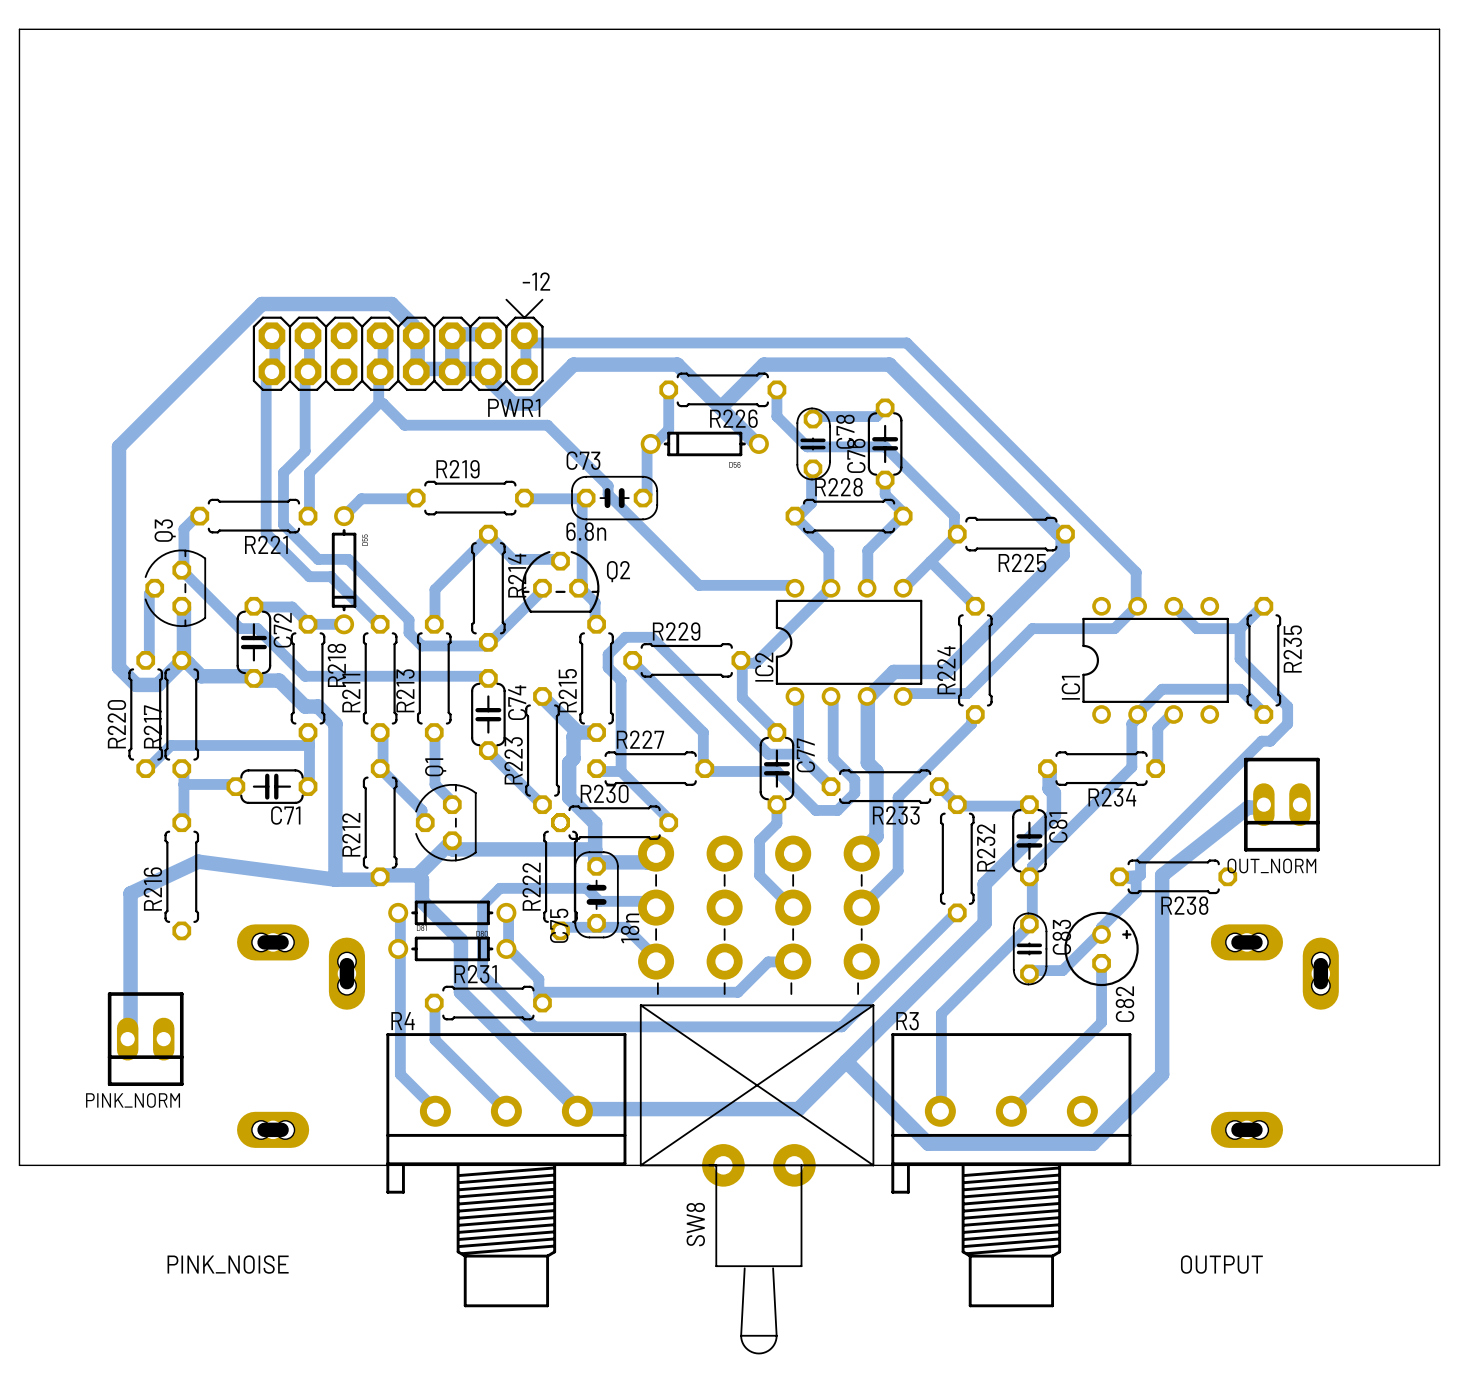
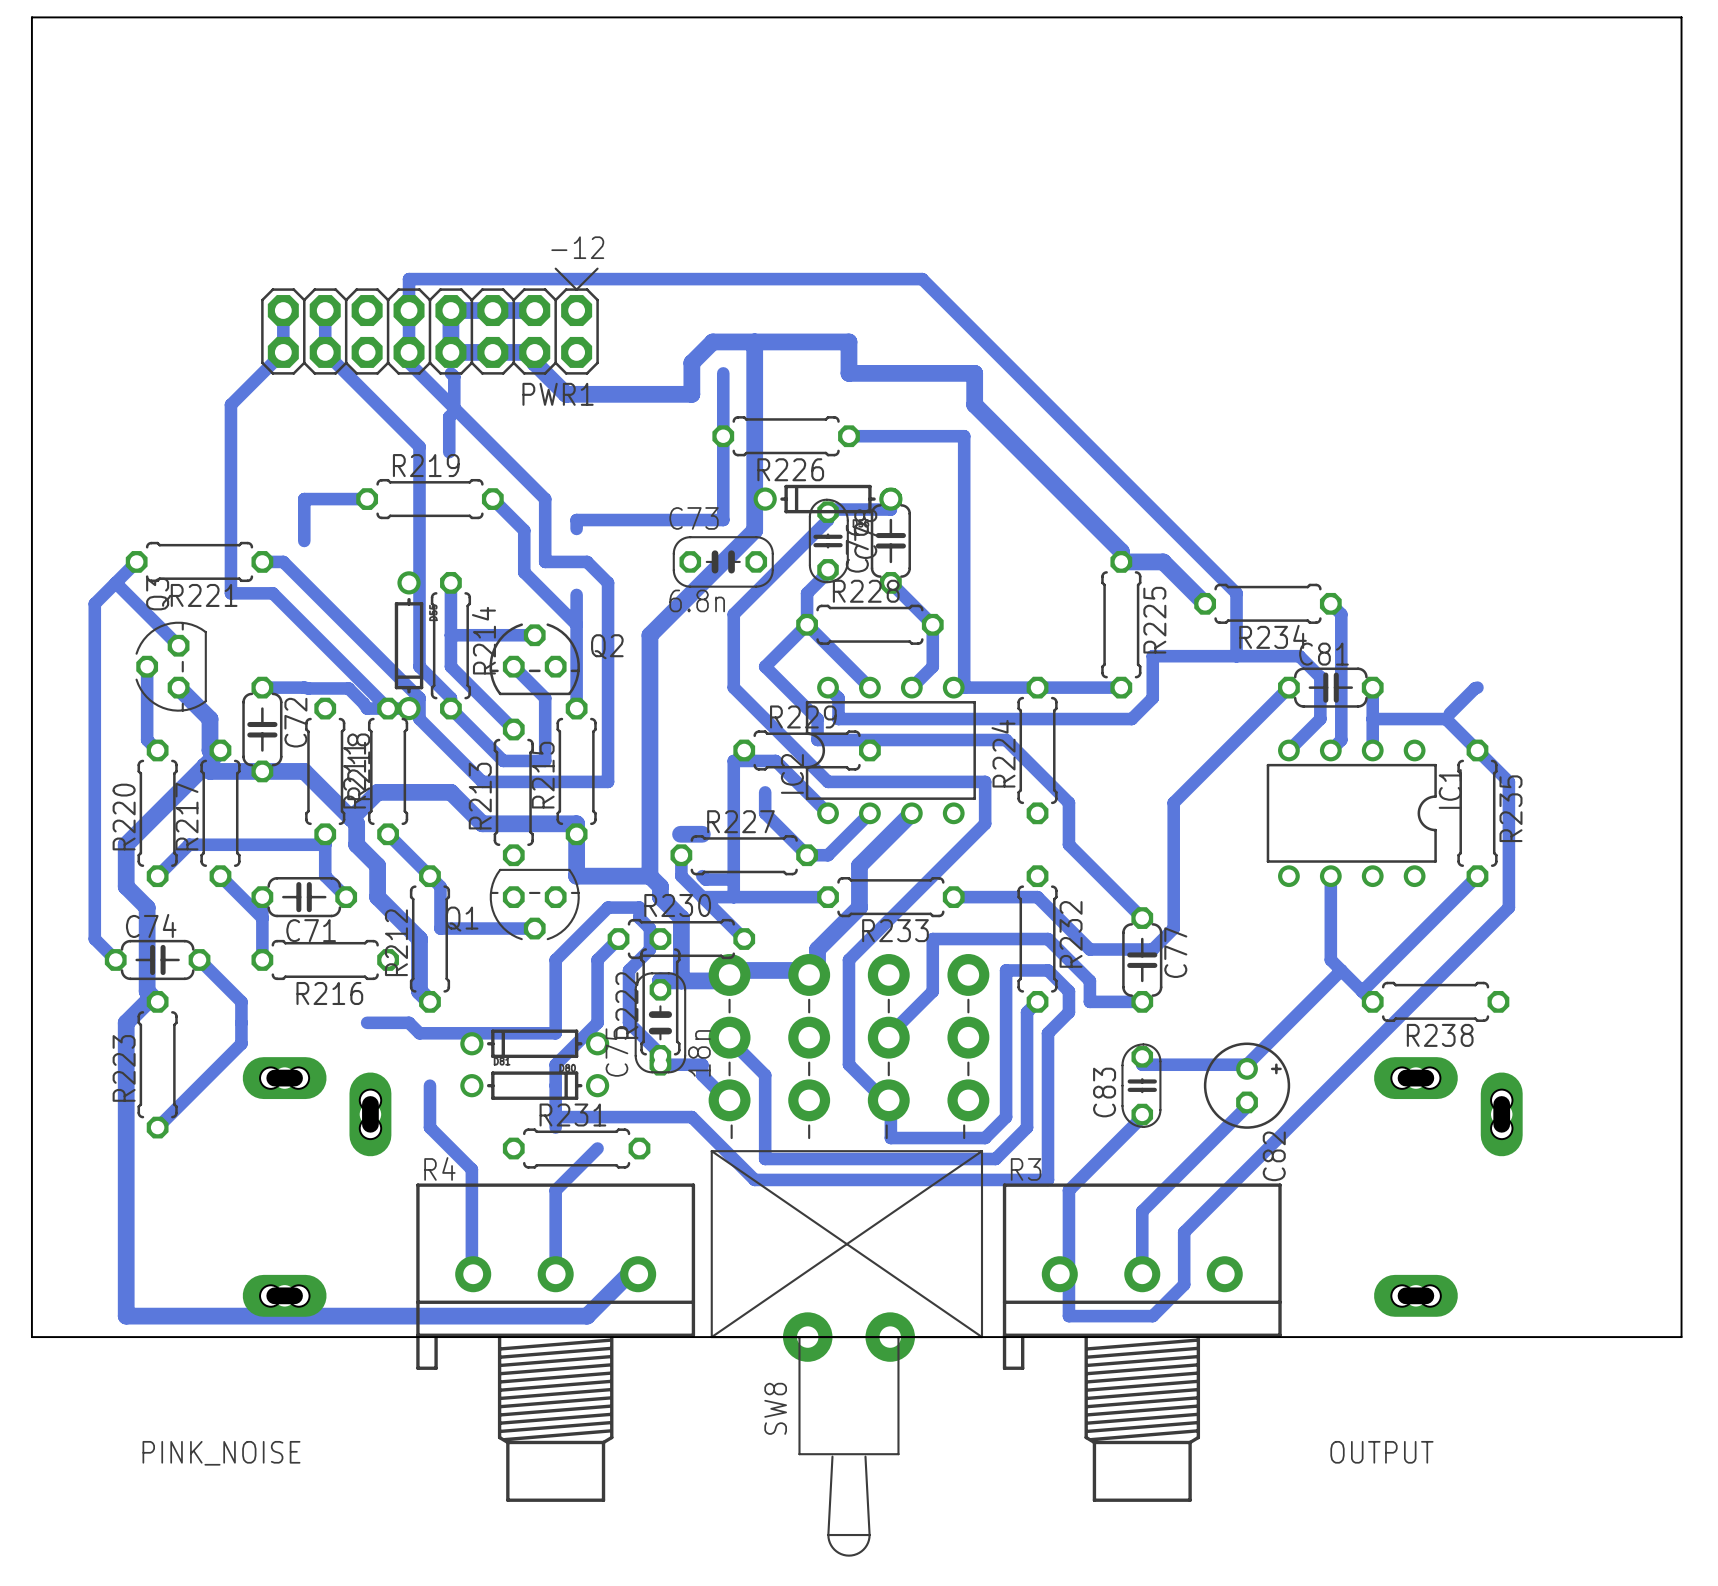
bottom track: none -> (283, 310) (283, 352) (230, 404) (230, 593) (272, 593) (388, 708)
bottom track: none -> (325, 310) (325, 352) (419, 446) (419, 666) (450, 698) (450, 708) (503, 760) (545, 760) (545, 698) (513, 666)
bottom track: none -> (534, 310) (450, 310) (450, 352) (534, 352) (534, 362) (566, 394) (691, 394) (691, 362) (712, 341) (848, 341) (848, 373) (974, 373) (974, 404) (1121, 551) (1121, 561) (1163, 561) (1205, 603)
bottom track: none -> (754, 341) (754, 530) (649, 635) (649, 876)
bottom track: (271, 335) (274, 338) (274, 368) (266, 377) (266, 533) (309, 576) (331, 576) (380, 624) -> none
bottom track: (308, 335) (309, 368) (305, 373) (305, 451) (283, 472) (283, 524) (318, 559) (348, 559) (409, 619) (409, 632) (422, 645) (486, 645) (488, 642) (543, 589) (542, 588) -> none
bottom track: (488, 335) (452, 335) (452, 371) (456, 368) (482, 368) (491, 373) (491, 381) (512, 403) (534, 403) (573, 364) (677, 364) (758, 443) -> (555, 1117) (691, 1117) (754, 1179) (1048, 1179) (1048, 1033) (1068, 1012) (1068, 991) (1048, 970) (1006, 970) (1006, 1117) (985, 1138) (890, 1138) (890, 1106) (888, 1100) (880, 1096) (848, 1064) (848, 959) (985, 823) (985, 781) (828, 781) (733, 687) (733, 614) (828, 520) (828, 509) (890, 509) (890, 499)
bottom track: none -> (723, 373) (723, 520) (576, 520) (576, 528)
PWR1 position: (398, 344) -> (429, 321)
bottom track: (452, 368) (422, 368) (416, 371) (417, 338) (413, 325) (391, 304) (261, 304) (119, 446) (119, 667) (136, 684) (157, 684) (181, 660) -> none
bottom track: (524, 371) (524, 335) (530, 342) (906, 342) (1136, 572) (1137, 606) (1114, 628) (1032, 628) (967, 693) (906, 693) (903, 696) -> none
bottom track: (668, 389) (668, 429) (655, 442) (647, 446) (647, 494) (643, 498) -> none
bottom track: none -> (848, 436) (964, 436) (964, 687)
R226 position: (722, 389) -> (786, 436)
bottom track: (776, 389) (776, 416) (807, 446) (885, 446) (954, 516) (954, 533) (957, 534) (903, 588) -> none
bottom track: (720, 407) (763, 364) (889, 364) (1058, 533) (1065, 534) (1062, 537) (1062, 555) (945, 671) (893, 671) (867, 696) (867, 762) (876, 771) (876, 836) (861, 853) -> none
bottom track: (885, 407) (876, 416) (815, 416) (813, 419) -> none
bottom track: none -> (367, 499) (304, 499) (304, 540)
bottom track: none -> (492, 499) (524, 530) (524, 572) (576, 624)
C78 position: (813, 443) -> (828, 540)
C76 position: (885, 443) -> (890, 540)
bottom track: (813, 468) (811, 503) (798, 516) (794, 516) (828, 550) (828, 585) (831, 588) (755, 663) (746, 663) (740, 660) (742, 697) (776, 732) -> none
bottom track: (885, 480) (885, 494) (902, 511) (903, 516) (867, 550) (867, 588) -> none
bottom track: none -> (136, 561) (94, 603) (94, 939) (115, 959)
bottom track: none -> (262, 561) (283, 561) (419, 698) (419, 719) (482, 781) (608, 781) (608, 582) (587, 561) (545, 561) (545, 499) (409, 362) (409, 279) (922, 279) (1236, 593) (1236, 656)
bottom track: (416, 498) (361, 498) (344, 516) -> none
R219 position: (470, 498) -> (429, 499)
bottom track: (524, 498) (586, 498) (582, 503) (582, 585) (578, 588) (595, 602) (596, 624) -> none
bottom track: none -> (828, 569) (828, 572) (807, 593) (807, 624)
bottom track: none -> (115, 582) (178, 645)
bottom track: (199, 516) (196, 516) (183, 529) (183, 568) (181, 570) (240, 628) (257, 628) (305, 676) (486, 676) (488, 678) -> none
R221 position: (253, 516) -> (199, 561)
bottom track: (308, 516) (309, 472) (378, 403) (383, 403) (404, 425) (547, 425) (608, 485) (608, 494) (699, 585) (794, 585) (794, 588) -> none
bottom track: none -> (450, 582) (450, 666) (513, 729)
bottom track: none -> (890, 582) (932, 624) (932, 666) (911, 687)
R228 position: (849, 516) -> (869, 624)
bottom track: none -> (576, 594) (576, 708)
R225 rotation: 0° (1011, 534) -> 90° clockwise (1121, 624)
bottom track: none -> (1330, 603) (1341, 614) (1341, 740) (1330, 750)
bottom track: none -> (807, 624) (765, 666) (817, 719) (817, 740) (1006, 740) (1068, 802) (1068, 844) (1142, 918)
bottom track: none -> (807, 624) (869, 687)
bottom track: none -> (450, 635) (534, 635)
bottom track: (560, 561) (560, 559) (512, 559) (488, 534) (434, 589) (434, 624) -> none
bottom track: (930, 561) (975, 606) -> none
R225 name position: R225 (1022, 562) -> R225 (1154, 620)
Q2 position: (560, 581) -> (534, 659)
bottom track: none -> (147, 666) (147, 740) (157, 750)
bottom track: (154, 588) (149, 594) (149, 658) (145, 660) -> none
Q3 position: (175, 588) -> (171, 666)
R214 position: (488, 588) -> (450, 645)
bottom track: none -> (178, 687) (210, 719) (210, 750) (220, 750) (126, 844) (126, 886) (147, 907) (147, 991) (157, 1001) (147, 1001) (126, 1022) (126, 1316) (587, 1316) (629, 1274) (638, 1274)
bottom track: (181, 606) (183, 607) (183, 658) (181, 660) -> none
bottom track: none -> (262, 687) (304, 687)
bottom track: none -> (828, 687) (838, 698) (838, 719) (1131, 719) (1152, 698) (1152, 656) (1299, 656) (1320, 677) (1320, 719) (1288, 750)
bottom track: none -> (953, 687) (1121, 687)
bottom track: none -> (1288, 687) (1173, 802) (1173, 928) (1152, 949) (1089, 949) (1037, 897) (953, 897)
bottom track: (1173, 606) (1196, 628) (1240, 628) (1240, 658) (1287, 706) (1287, 723) (1270, 741) (1261, 741) (1140, 862) (1140, 875) (1119, 876) (1136, 879) (1136, 892) (1101, 927) (1101, 934) -> (1372, 687) (1372, 750)
bottom track: none -> (1372, 719) (1446, 719) (1508, 781) (1508, 907) (1184, 1232) (1184, 1284) (1152, 1316) (1068, 1316) (1068, 1190) (1142, 1117) (1142, 1114)
C72 position: (253, 642) -> (262, 729)
IC2 position: (849, 642) -> (890, 750)
bottom track: (181, 660) (188, 663) (201, 676) (253, 676) (257, 680) (279, 680) (305, 706) (318, 706) (335, 723) (335, 879) -> none
bottom track: (632, 660) (703, 732) (703, 767) (707, 771) (776, 771) (815, 810) (837, 810) (854, 793) (854, 780) (833, 758) (833, 697) (831, 696) -> none
R224 position: (975, 660) -> (1037, 750)
IC1 rotation: 0° (1155, 660) -> 180° (1351, 813)
R235 position: (1263, 660) -> (1477, 813)
bottom track: none -> (204, 766) (210, 771) (304, 771) (356, 823) (356, 844) (377, 865) (377, 897) (419, 939) (419, 991) (429, 1001)
R218 position: (308, 678) -> (325, 771)
R211 position: (380, 678) -> (388, 771)
R213 position: (434, 678) -> (513, 792)
R215 position: (596, 678) -> (576, 771)
bottom track: (542, 696) (577, 732) (573, 736) (573, 758) (569, 762) (569, 797) (595, 823) (596, 866) (599, 862) (647, 862) (656, 853) -> none
bottom track: none -> (765, 792) (765, 813) (807, 855) (828, 855) (869, 813)
bottom track: (794, 696) (798, 697) (798, 754) -> none
R220 position: (145, 714) -> (157, 813)
C74 rotation: 0° (488, 714) -> 90° counterclockwise (157, 959)
C74 position: (488, 714) -> (157, 959)
bottom track: none -> (828, 813) (775, 760) (733, 760) (733, 897)
bottom track: none -> (911, 813) (859, 865) (859, 907) (817, 949) (817, 970) (809, 974) (807, 970) (733, 970) (723, 980) (660, 980) (660, 989)
bottom track: (975, 714) (971, 715) (971, 723) (898, 797) (898, 871) (861, 907) -> none
bottom track: (1173, 714) (1157, 728) (1157, 767) (1155, 768) -> none
bottom track: (1263, 714) (1240, 689) (1162, 689) (1140, 710) (1131, 723) (1131, 767) (1032, 866) (1032, 875) (1029, 876) (1032, 879) (1032, 922) (941, 1013) (940, 1111) -> none
bottom track: none -> (351, 818) (377, 792) (450, 792) (482, 823) (576, 823) (576, 876) (649, 876)
bottom track: none -> (325, 834) (325, 876) (346, 897)
bottom track: (308, 732) (308, 786) -> none
bottom track: none -> (388, 834) (440, 886) (440, 928) (534, 928)
bottom track: (380, 732) (383, 732) (383, 767) (380, 768) (422, 810) (422, 819) (425, 822) -> none
bottom track: (434, 732) (434, 784) (452, 801) (452, 804) -> none
bottom track: none -> (325, 844) (189, 844) (157, 876)
bottom track: (309, 745) (170, 745) (145, 768) -> none
bottom track: (488, 750) (542, 804) -> none
R223 position: (542, 750) -> (157, 1064)
bottom track: none -> (681, 855) (681, 876) (744, 939)
bottom track: (798, 754) (831, 786) -> none
bottom track: (798, 754) (768, 754) (651, 637) (625, 637) (608, 654) (608, 667) (621, 680) (621, 771) (668, 819) (668, 822) -> none
bottom track: (181, 768) (183, 771) (183, 819) (181, 822) -> (220, 876) (262, 918)
bottom track: none -> (649, 876) (660, 886) (660, 897) (681, 918) (681, 980)
R227 position: (650, 768) -> (744, 855)
C77 position: (776, 768) -> (1142, 959)
bottom track: (1047, 768) (1049, 771) (1049, 788) (1053, 793) (1053, 814) (984, 884) (984, 922) (798, 1109) (577, 1109) (577, 1111) (573, 1104) (460, 992) (460, 940) (422, 901) (422, 879) (417, 875) -> none
R234 position: (1101, 768) -> (1267, 603)
bottom track: none -> (1330, 876) (1330, 959) (1372, 1001)
bottom track: none -> (1477, 876) (1362, 991)
bottom track: (183, 784) (235, 784) (235, 786) -> none
bottom track: none -> (262, 897) (262, 959)
C71 position: (271, 786) -> (304, 897)
bottom track: none -> (702, 897) (828, 897)
R233 position: (885, 786) -> (890, 897)
bottom track: (939, 786) (958, 806) (1029, 804) -> none
bottom track: (776, 804) (776, 823) (759, 840) (759, 875) (793, 907) -> none
bottom track: (1263, 804) (1260, 807) (1248, 807) (1162, 875) (1162, 1074) (1092, 1143) (928, 1143) (846, 1061) -> none
OUT_NORM: (1281, 804) -> none
R212 position: (380, 822) -> (429, 939)
Q1 rotation: 0° (445, 822) -> 90° counterclockwise (534, 904)
bottom track: none -> (618, 939) (597, 959) (597, 1022) (555, 1064) (555, 1127)
R230 position: (614, 822) -> (681, 939)
bottom track: none -> (199, 959) (241, 1001) (241, 1043) (157, 1127)
C81 rotation: 0° (1029, 840) -> 90° counterclockwise (1330, 687)
C81 position: (1029, 840) -> (1330, 687)
bottom track: (595, 849) (452, 849) (452, 840) (417, 875) -> none
bottom track: none -> (1341, 970) (1247, 1064)
R232 position: (957, 858) -> (1037, 939)
bottom track: (417, 875) (383, 875) (374, 879) (335, 879) -> none
R216 rotation: 0° (181, 876) -> 90° clockwise (325, 959)
R216 position: (181, 876) -> (325, 959)
bottom track: none -> (1037, 1001) (1027, 1012) (1027, 1127) (995, 1159) (765, 1159) (765, 1075) (729, 1037)
bottom track: none -> (1142, 1001) (1089, 1001) (1089, 980) (1048, 939) (932, 939) (932, 991) (888, 1037)
R238 position: (1173, 876) -> (1435, 1001)
bottom track: (335, 879) (198, 861) (130, 893) (130, 1035) (127, 1039) -> none
R216 name position: R216 (152, 889) -> R216 (329, 993)
C75 position: (596, 894) -> (660, 1022)
bottom track: (656, 907) (651, 901) (599, 901) (586, 888) (499, 888) (482, 905) (482, 974) (534, 1026) (841, 1026) (957, 912) -> none
bottom track: (398, 912) (400, 914) (400, 948) (398, 948) (400, 953) (400, 1074) (435, 1111) -> none
bottom track: (506, 912) (508, 914) (508, 944) (506, 948) (538, 979) (538, 1000) (542, 1003) -> none
bottom track: none -> (1142, 1056) (1142, 1064) (1247, 1064)
bottom track: (560, 927) (595, 927) (596, 923) (599, 927) (625, 927) (655, 957) (656, 961) -> (660, 1060) (660, 1054) (629, 1022) (629, 970) (649, 949) (649, 928) (639, 918) (639, 907) (608, 907) (555, 959) (555, 1033) (419, 1033) (409, 1022) (367, 1022)
bottom track: none -> (660, 1064) (702, 1064) (702, 1075) (729, 1100)
bottom track: (1101, 931) (1062, 970) (1032, 970) (1029, 973) -> none
bottom track: none -> (429, 1085) (429, 1127) (471, 1169) (473, 1274)
C83 rotation: 0° (1030, 948) -> 180° (1141, 1085)
C83 position: (1030, 948) -> (1141, 1085)
C82 position: (1101, 948) -> (1247, 1085)
bottom track: (793, 961) (768, 961) (737, 992) (538, 992) -> none
bottom track: none -> (1247, 1102) (1247, 1106) (1142, 1211) (1142, 1274)
bottom track: (1101, 963) (1101, 1022) (1011, 1111) -> none
bottom track: (434, 1003) (434, 1039) (506, 1111) -> none
bottom track: none -> (597, 1148) (555, 1190) (555, 1274)
PINK_NOISE position: (300, 1036) -> (317, 1186)
OUTPUT position: (1274, 1036) -> (1448, 1186)
PINK_NORM: (145, 1039) -> none
SW8 position: (758, 1095) -> (848, 1255)
R4 position: (506, 1170) -> (555, 1342)
R3 position: (1011, 1170) -> (1142, 1342)

